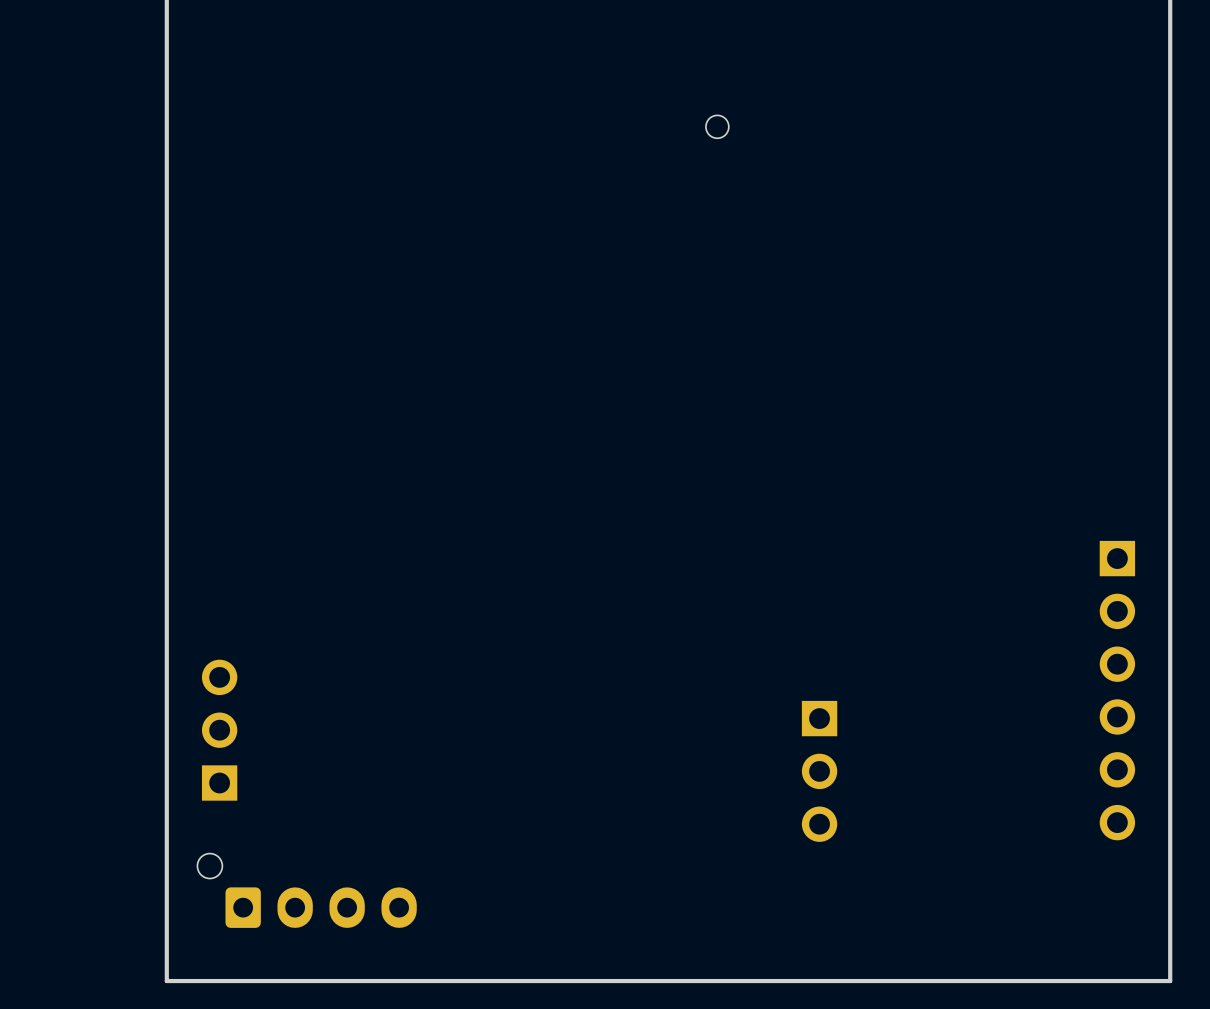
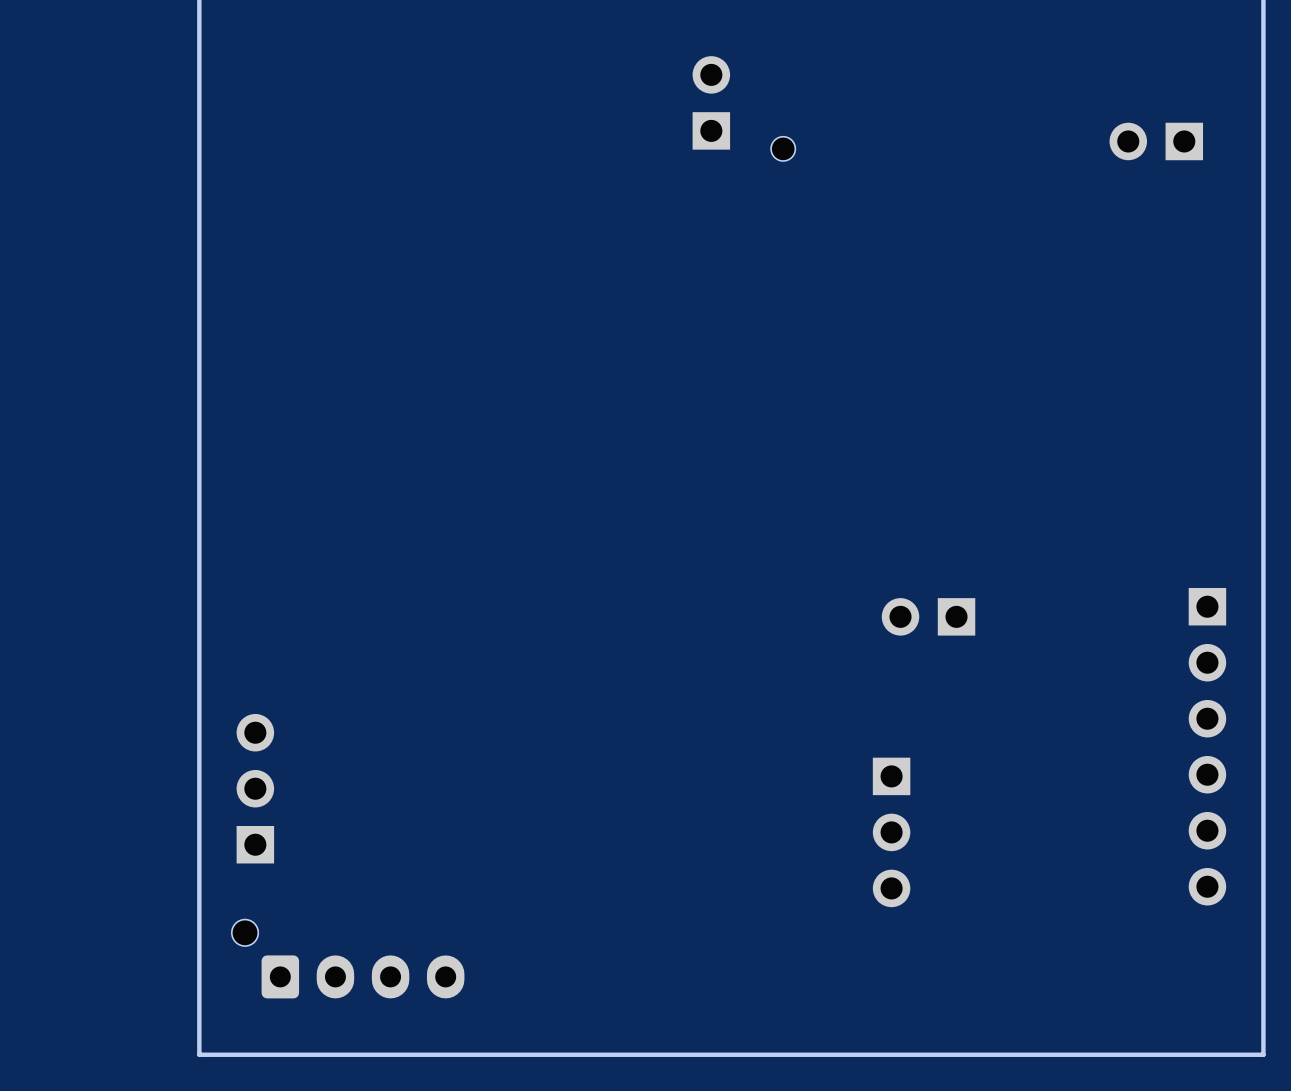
part: none -> (711, 102)
part: none -> (1156, 141)
part: none -> (928, 616)

